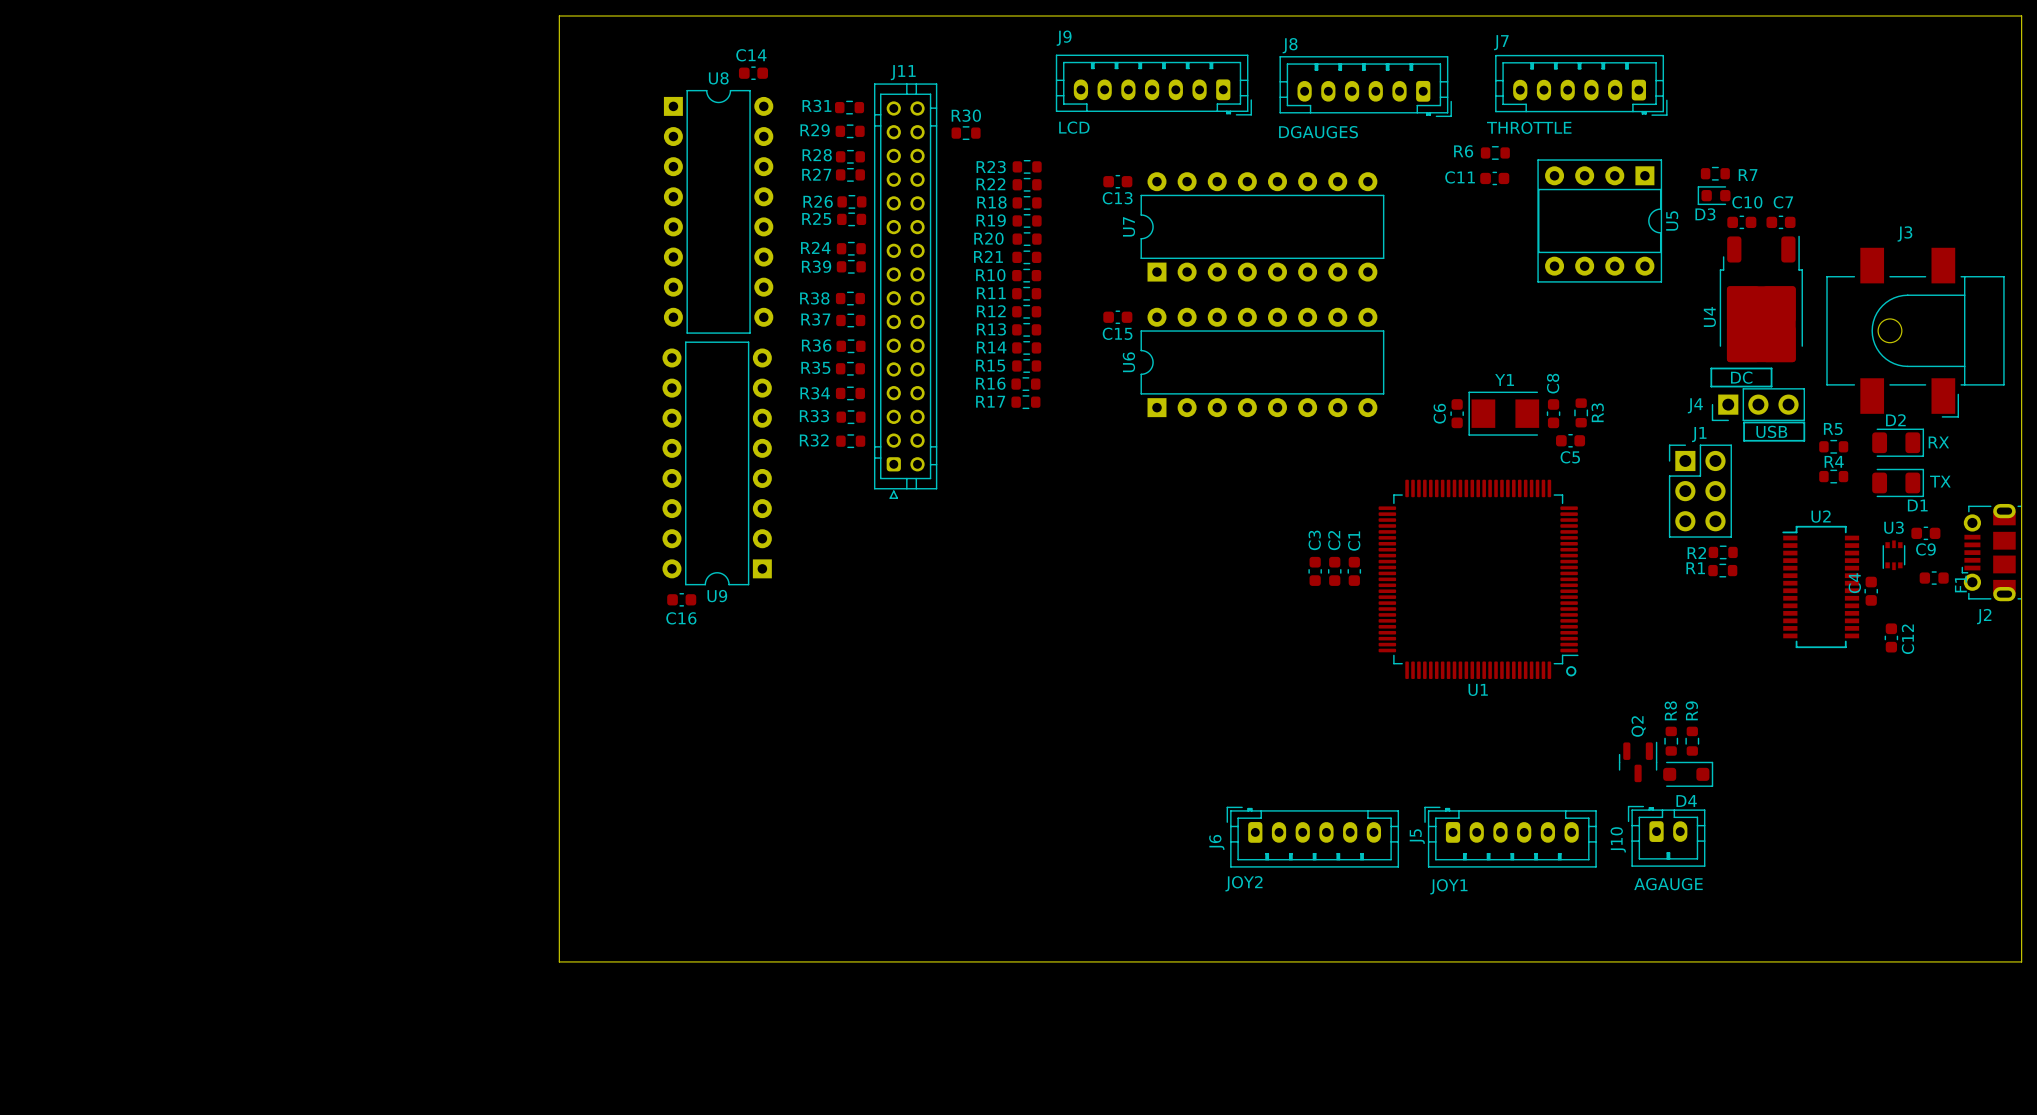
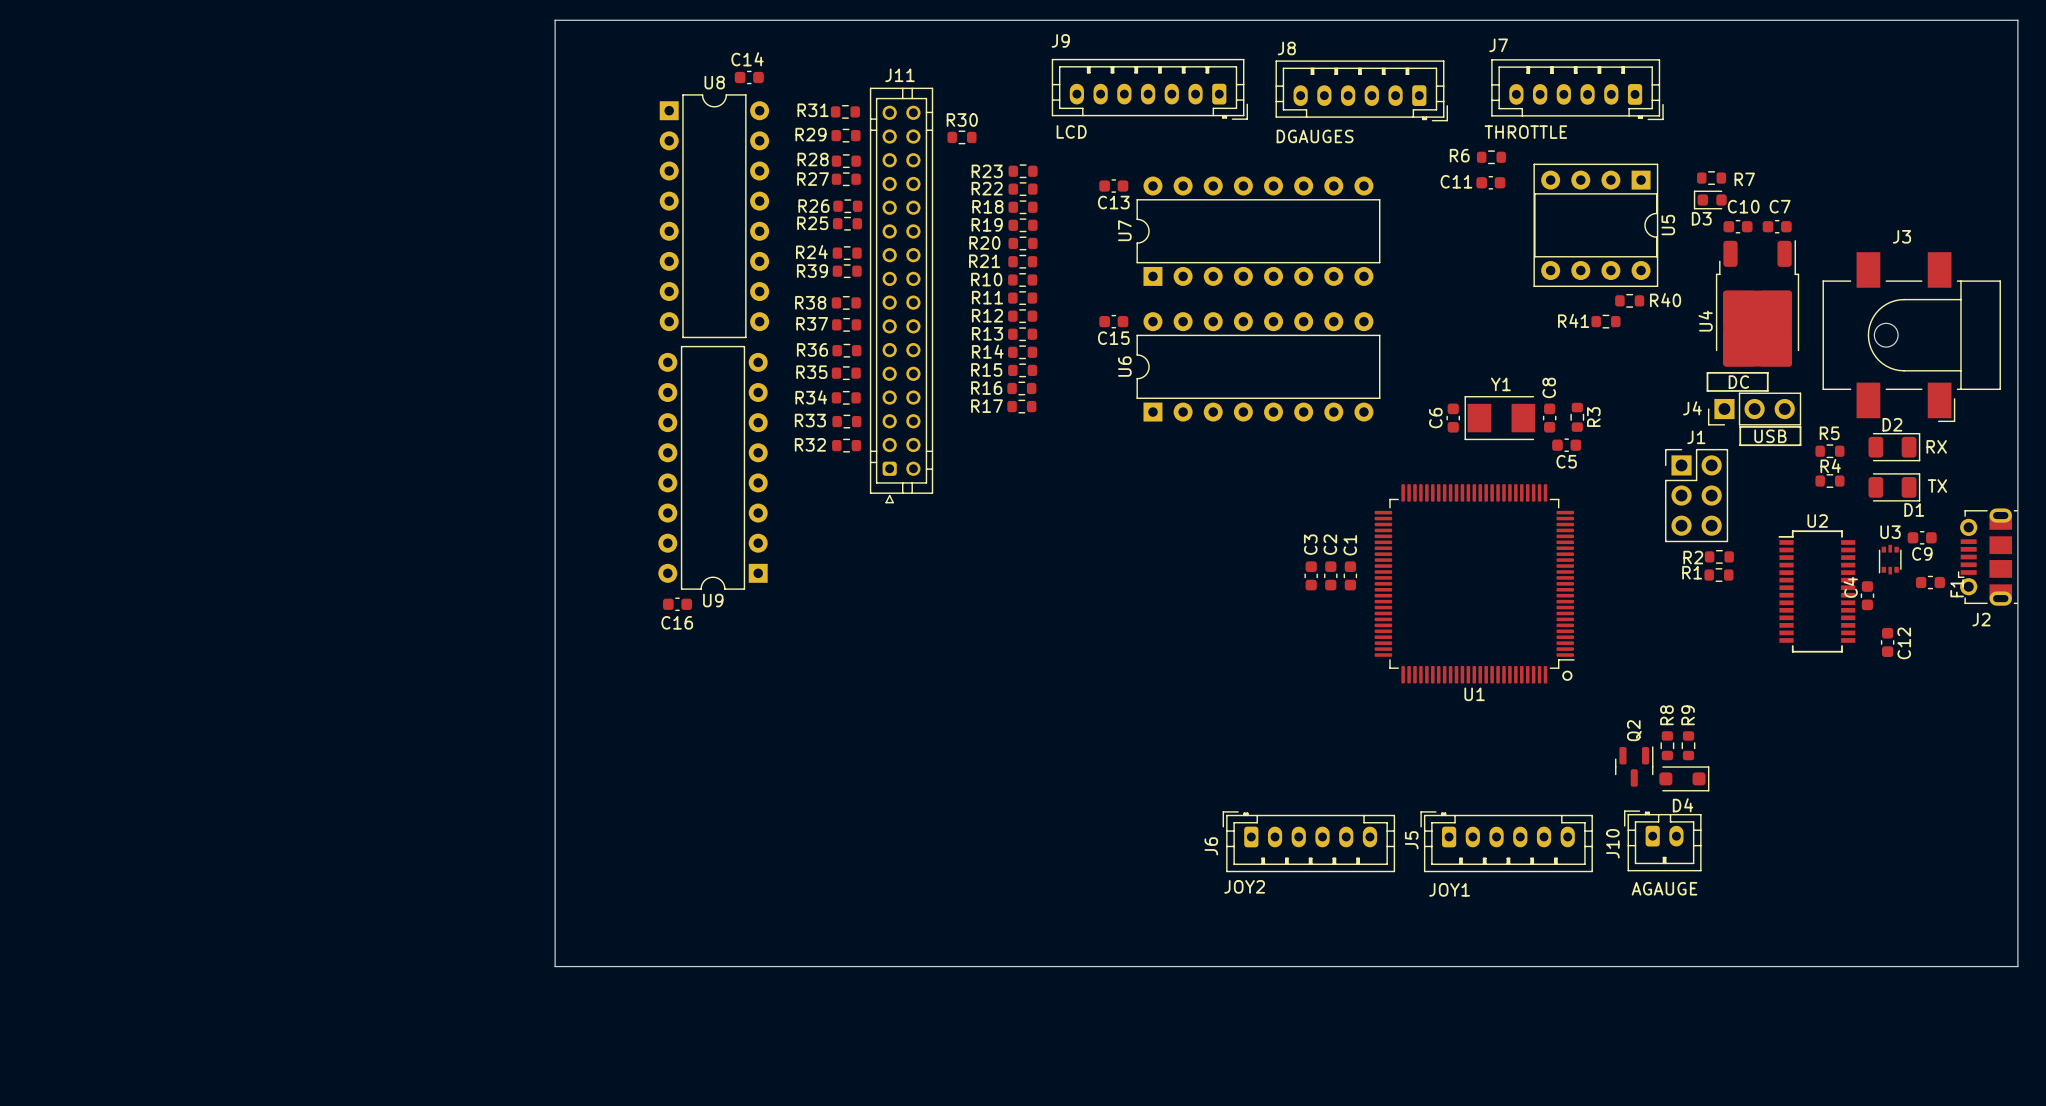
R40: none -> (1629, 300)
R41: none -> (1605, 321)

